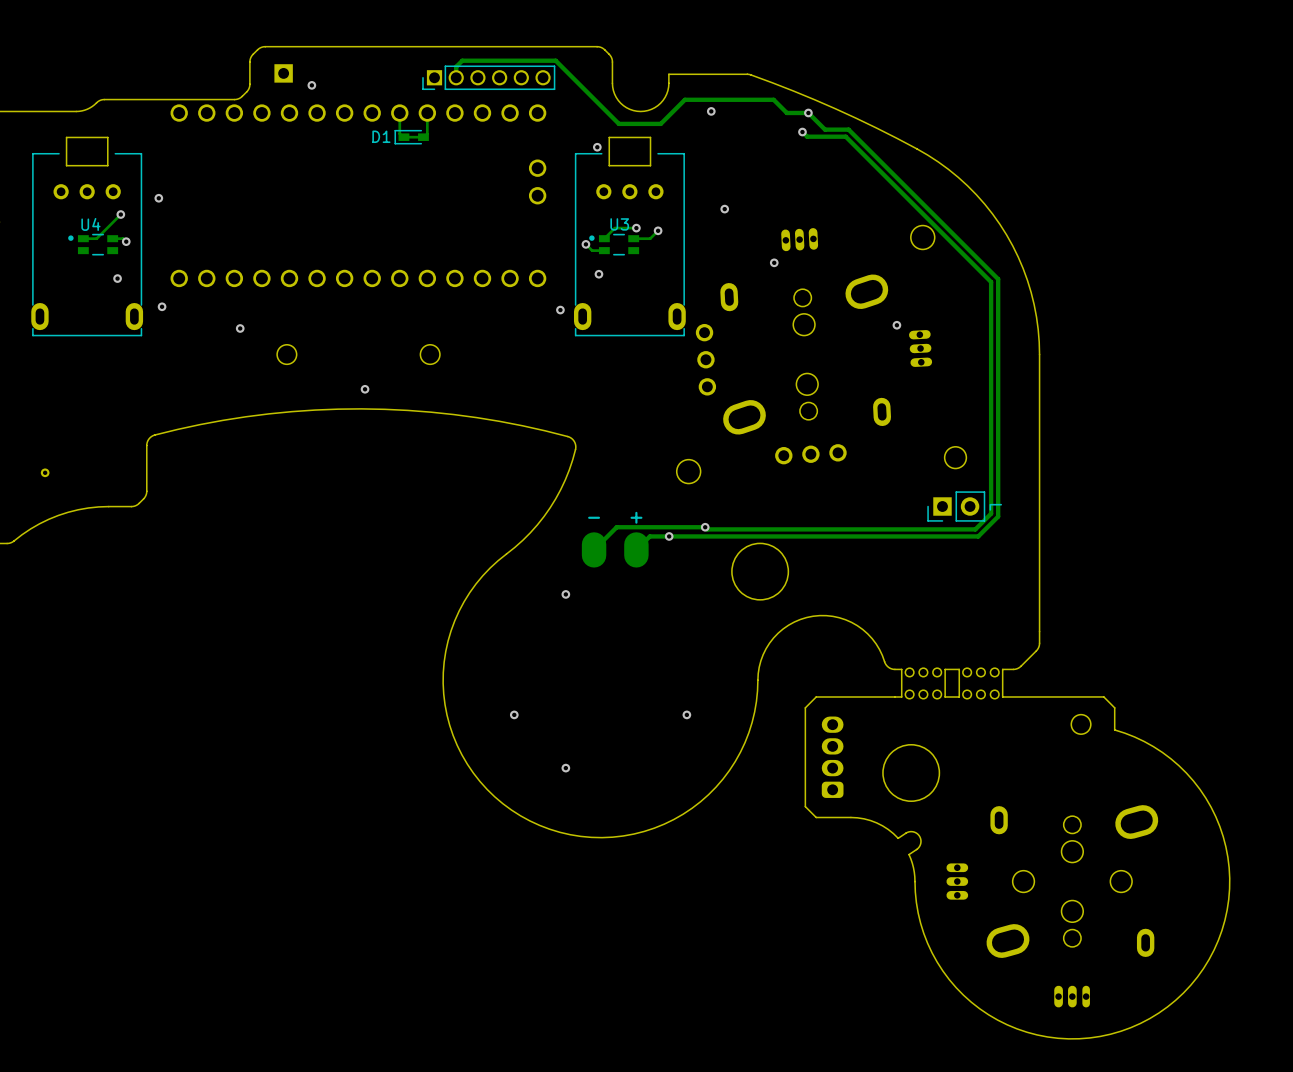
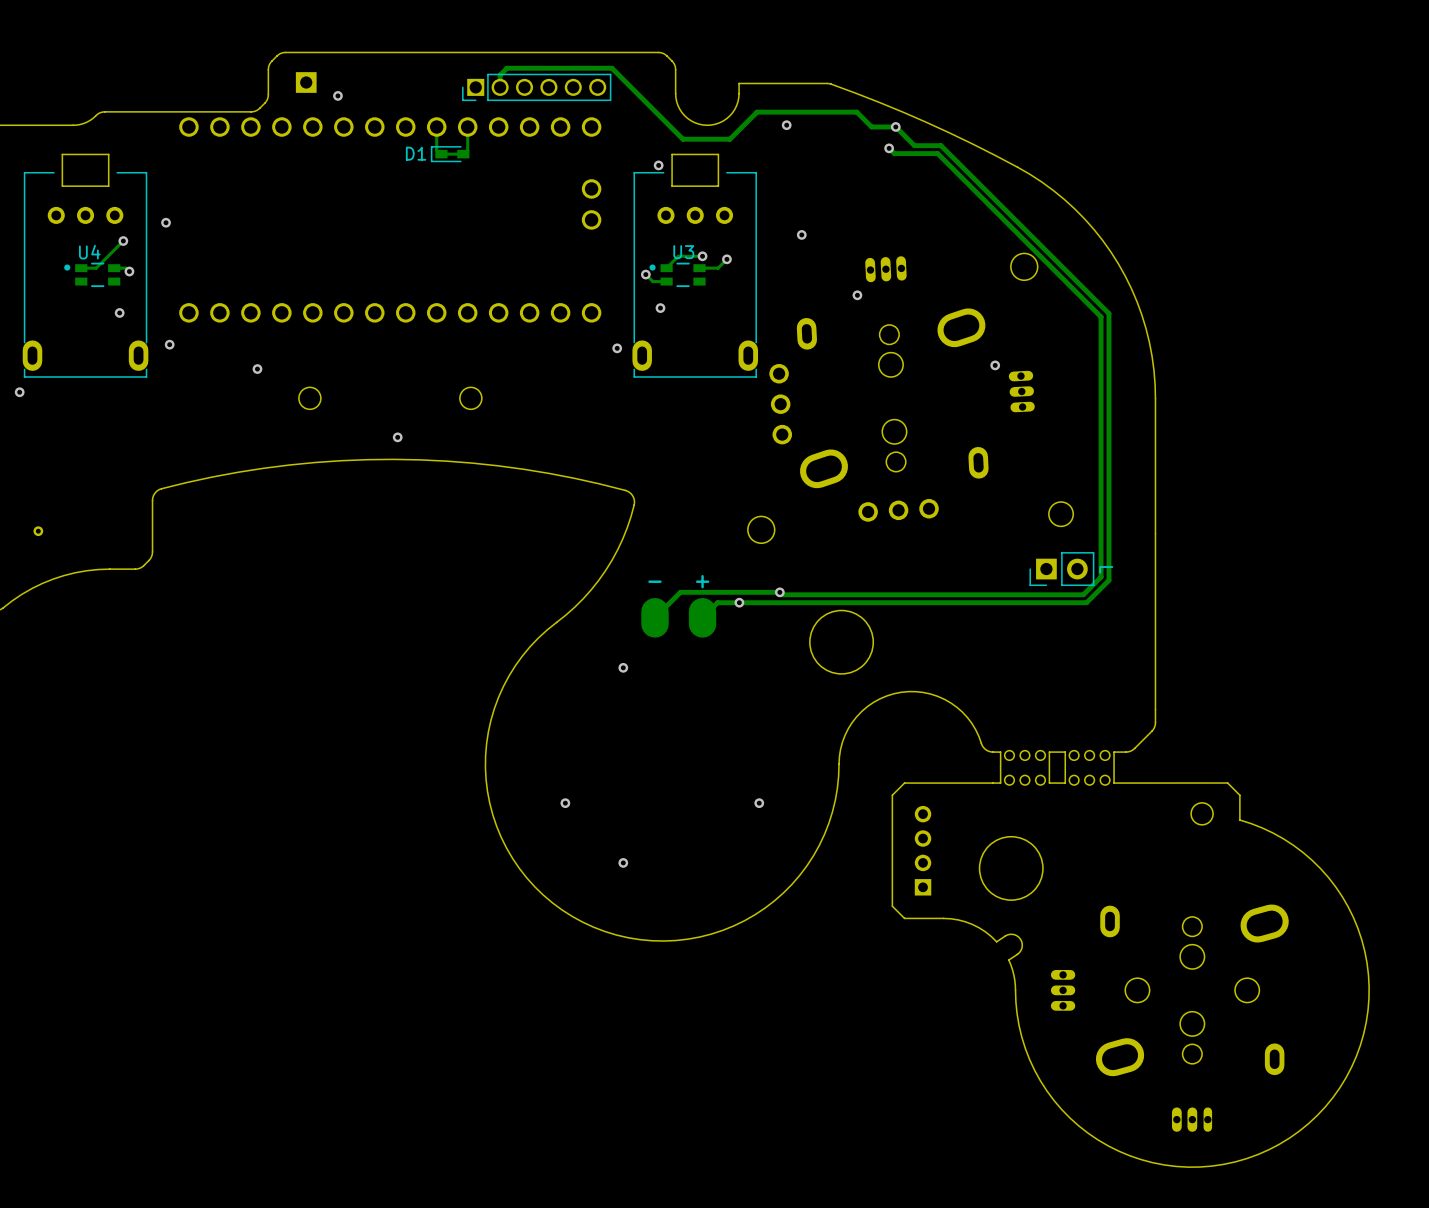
via: none -> (19, 392)
part footprint: [821, 716, 844, 798] -> [914, 805, 932, 896]

